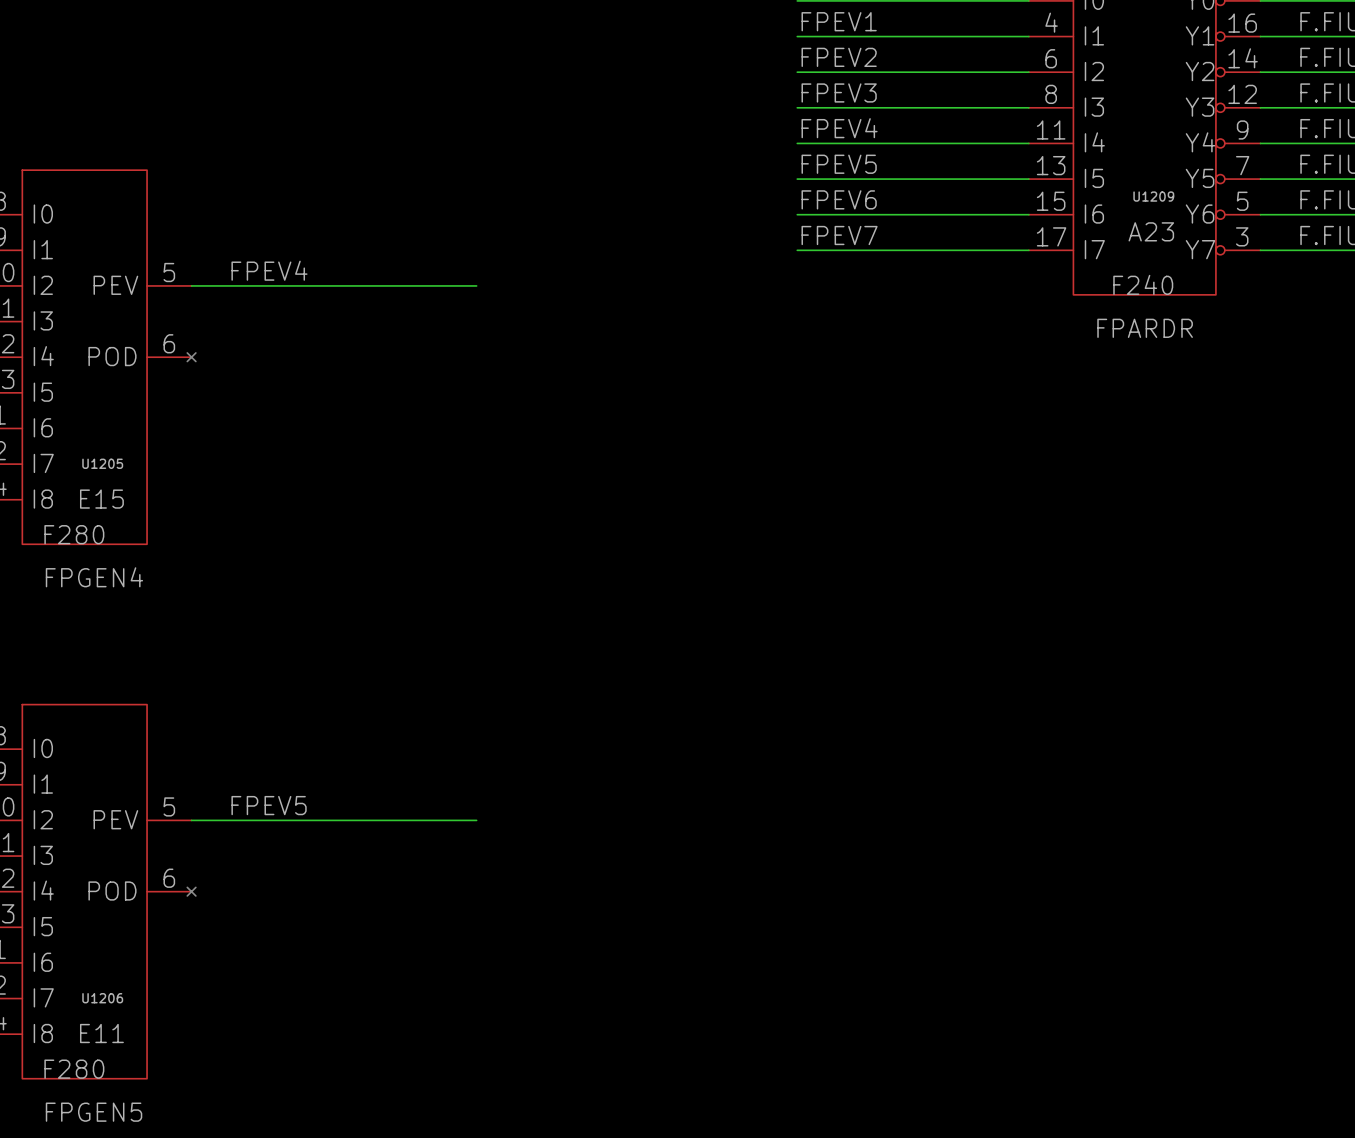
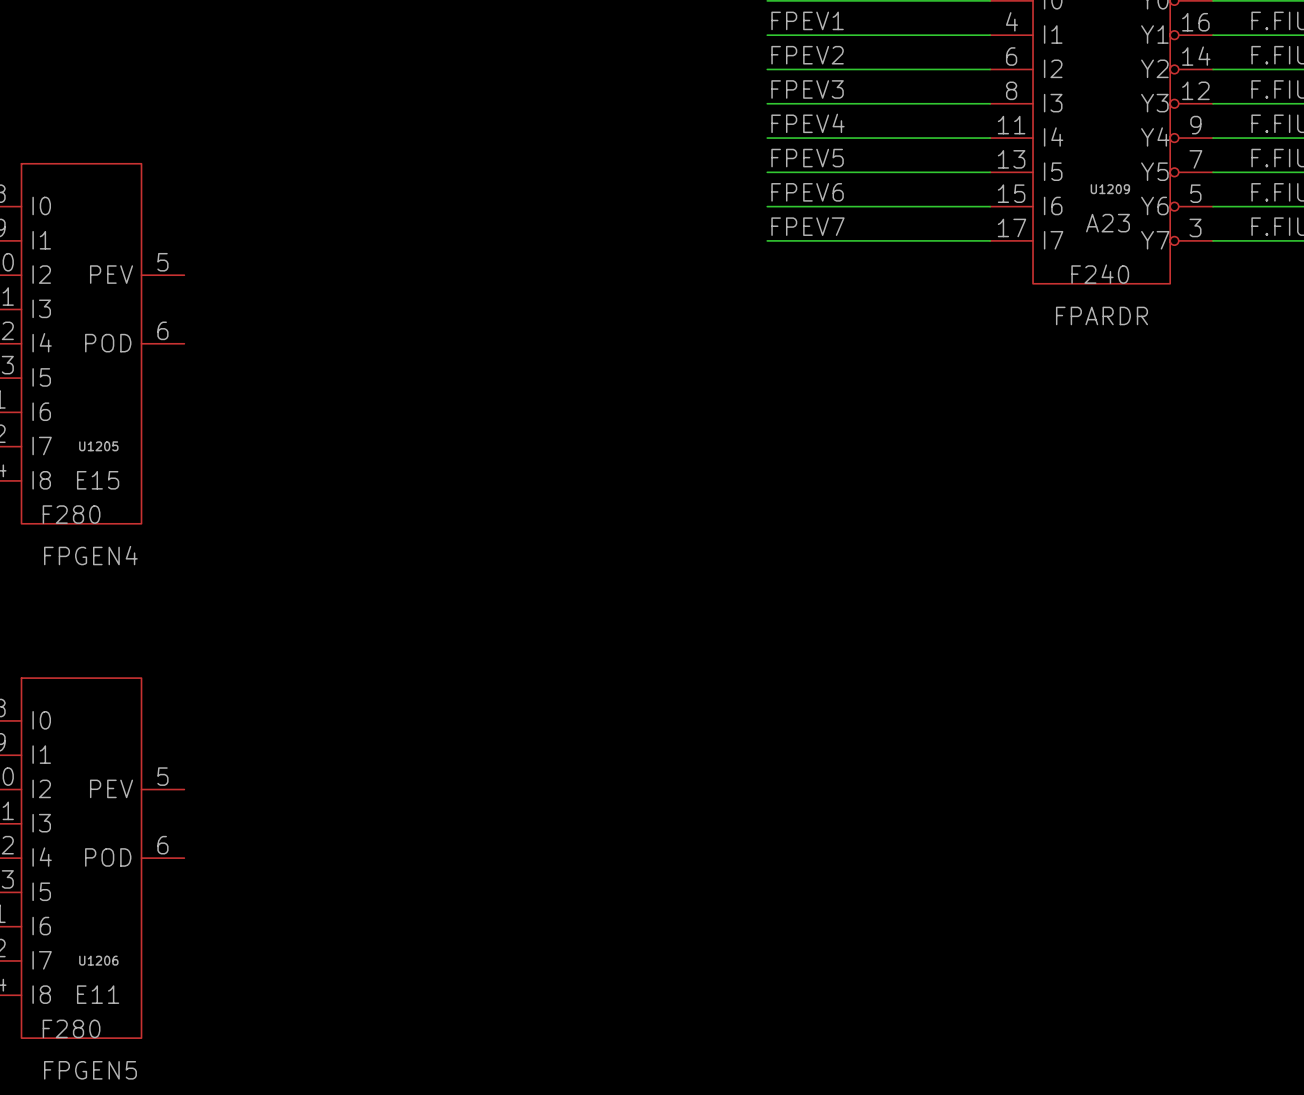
label: FPEV4 (269, 270) -> none
wire: (191, 285) (476, 285) -> none
no-connect mark: (191, 357) -> none
label: FPEV5 (269, 805) -> none
wire: (191, 820) (476, 820) -> none
no-connect mark: (191, 891) -> none

